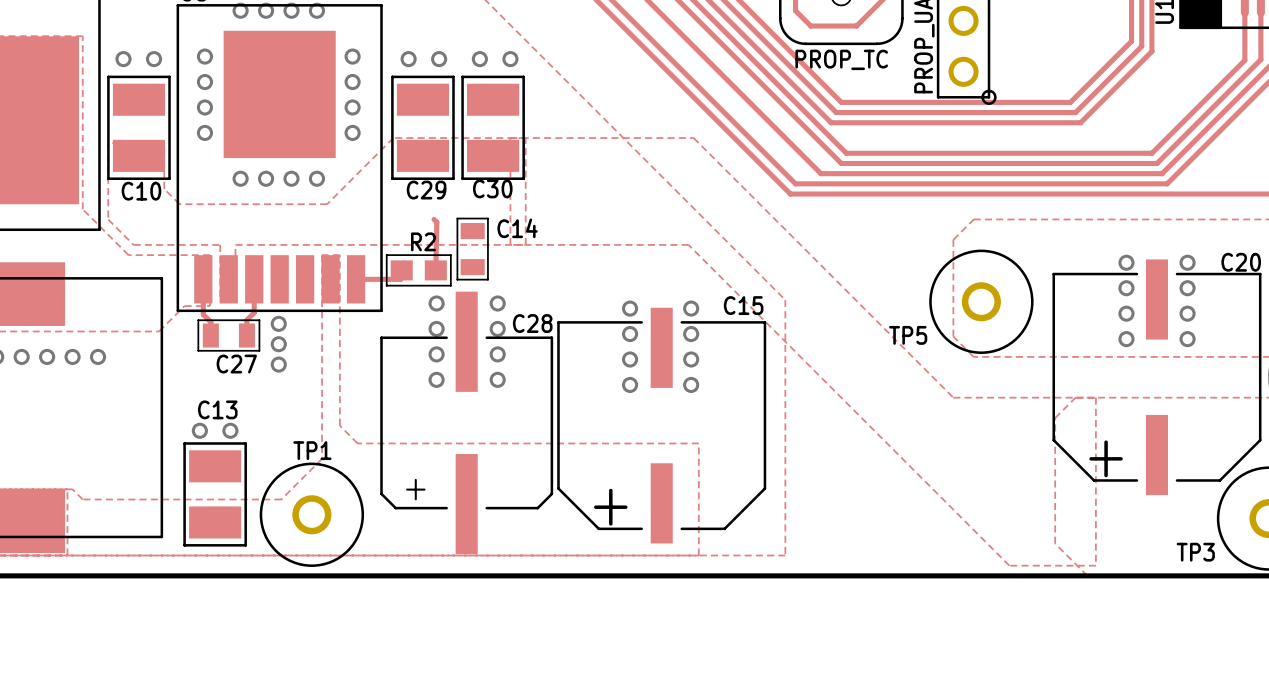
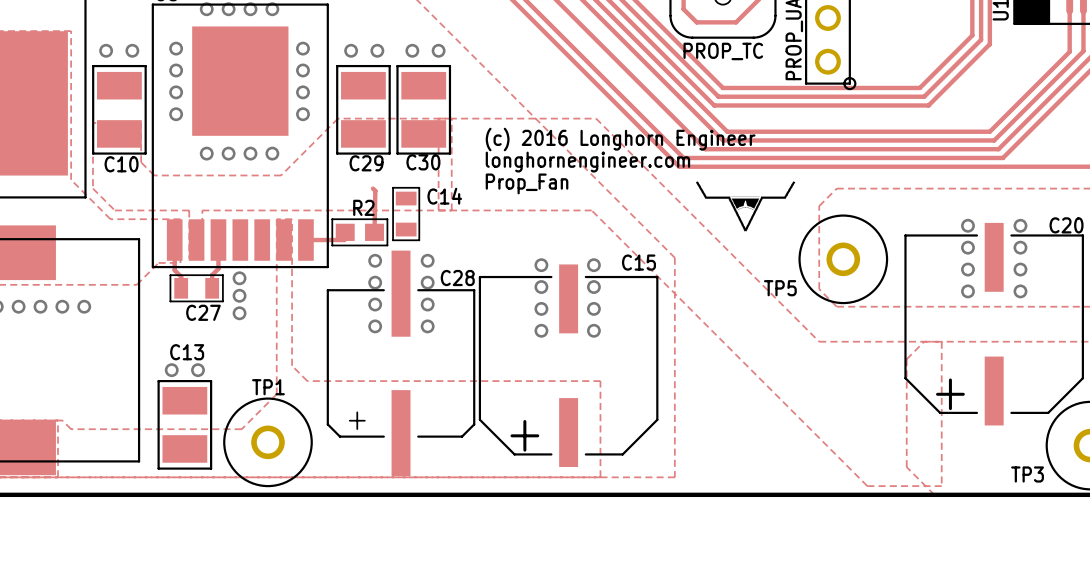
drawing: none -> [695, 181, 796, 232]

